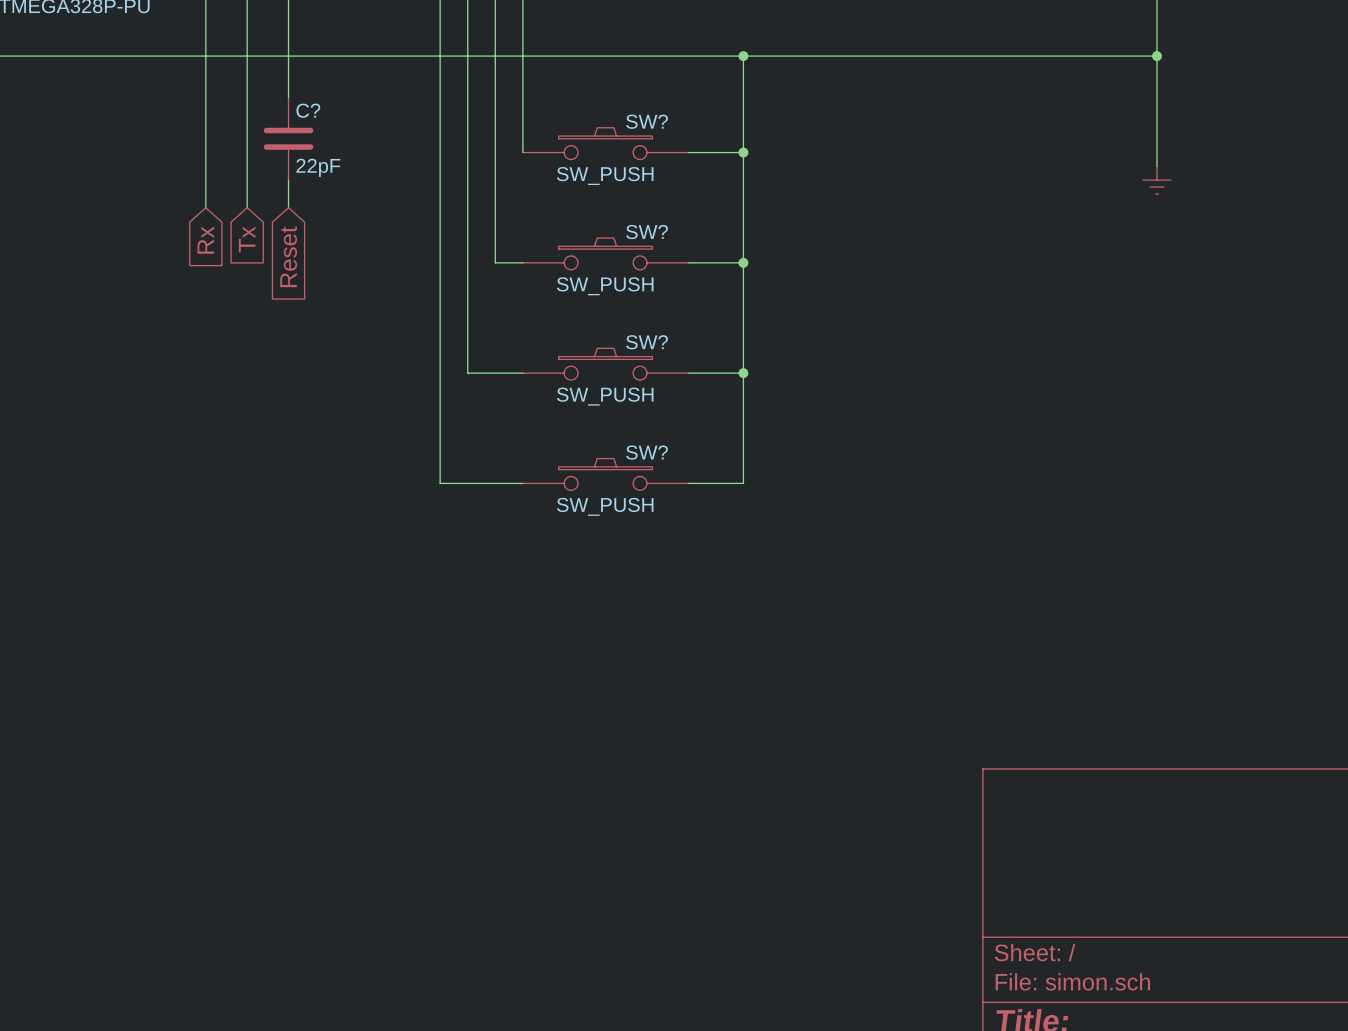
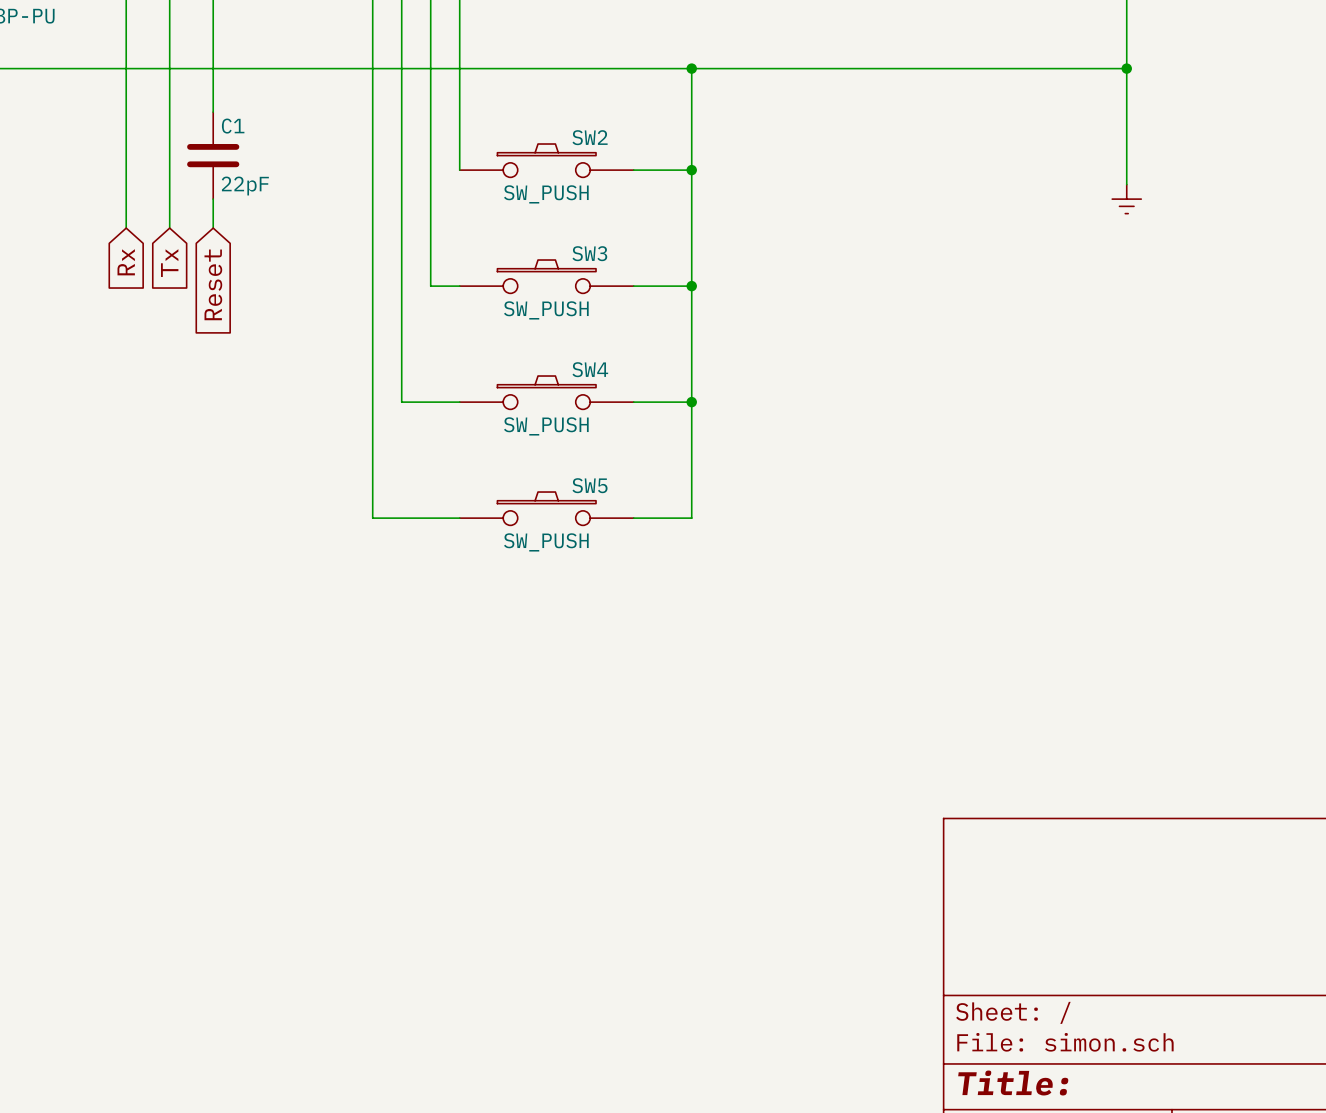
C? name: C? (308, 110) -> C1 (233, 126)
SW? name: SW? (647, 121) -> SW2 (590, 137)
SW? name: SW? (647, 232) -> SW3 (589, 253)
SW? name: SW? (647, 342) -> SW4 (590, 369)
SW? name: SW? (647, 452) -> SW5 (589, 485)

